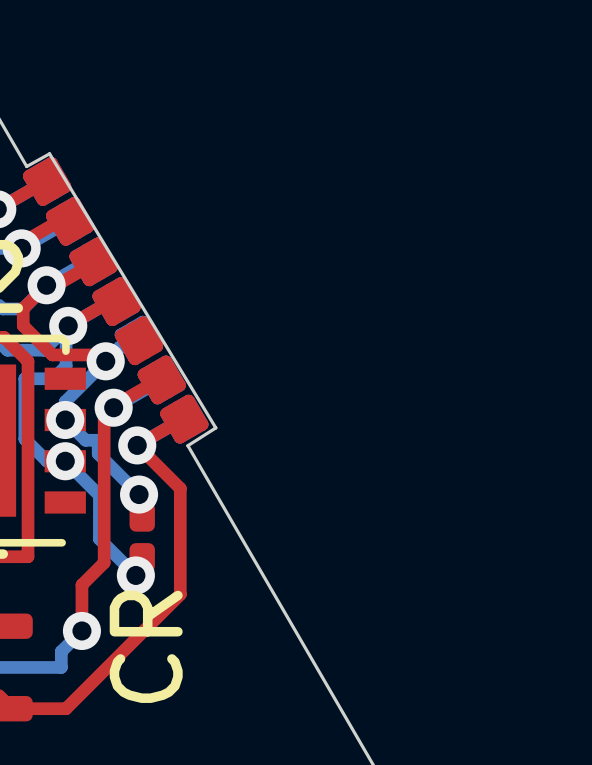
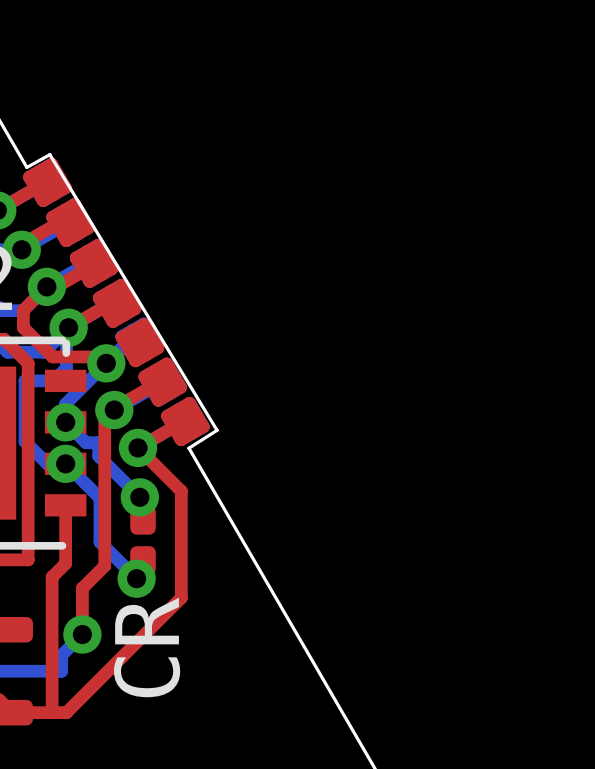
top track: none -> (65, 505) (65, 563) (52, 577) (52, 711) (50, 712)

